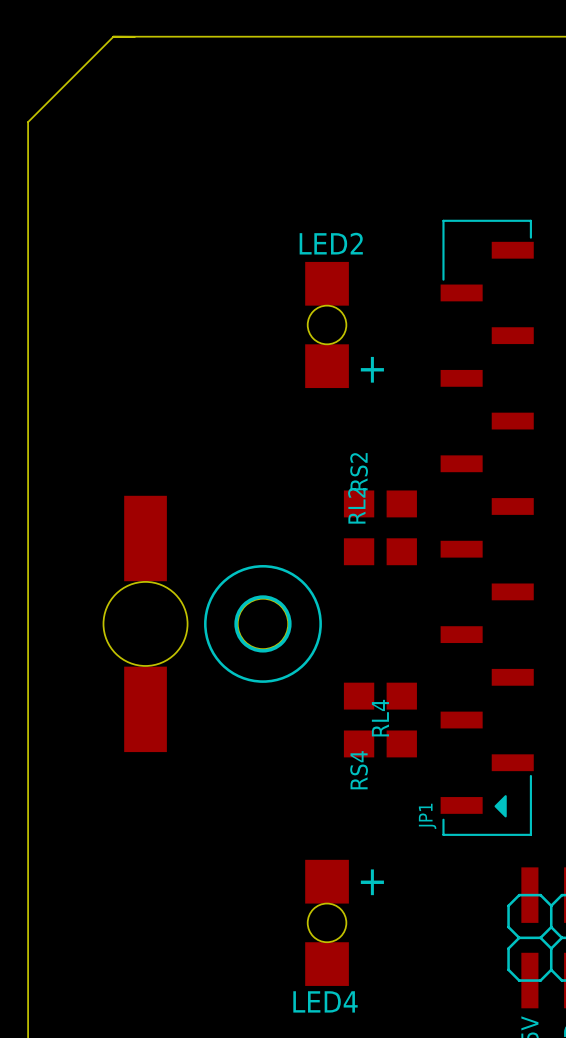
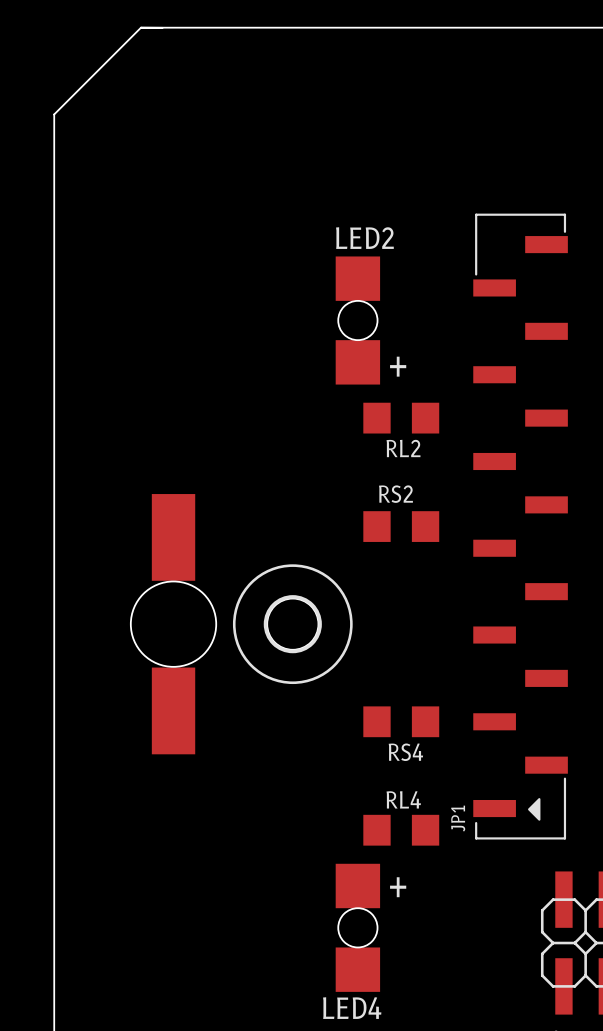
RL2 name position: RL2 (356, 505) -> RL2 (403, 448)
RS2 rotation: 0° (359, 527) -> 90° clockwise (401, 526)
RL2 rotation: 0° (401, 527) -> 90° clockwise (401, 418)
RL2 position: (401, 527) -> (401, 418)
RS4 rotation: 0° (359, 720) -> 90° clockwise (401, 721)
RL4 rotation: 0° (401, 720) -> 90° clockwise (401, 830)
RL4 position: (401, 720) -> (401, 830)

